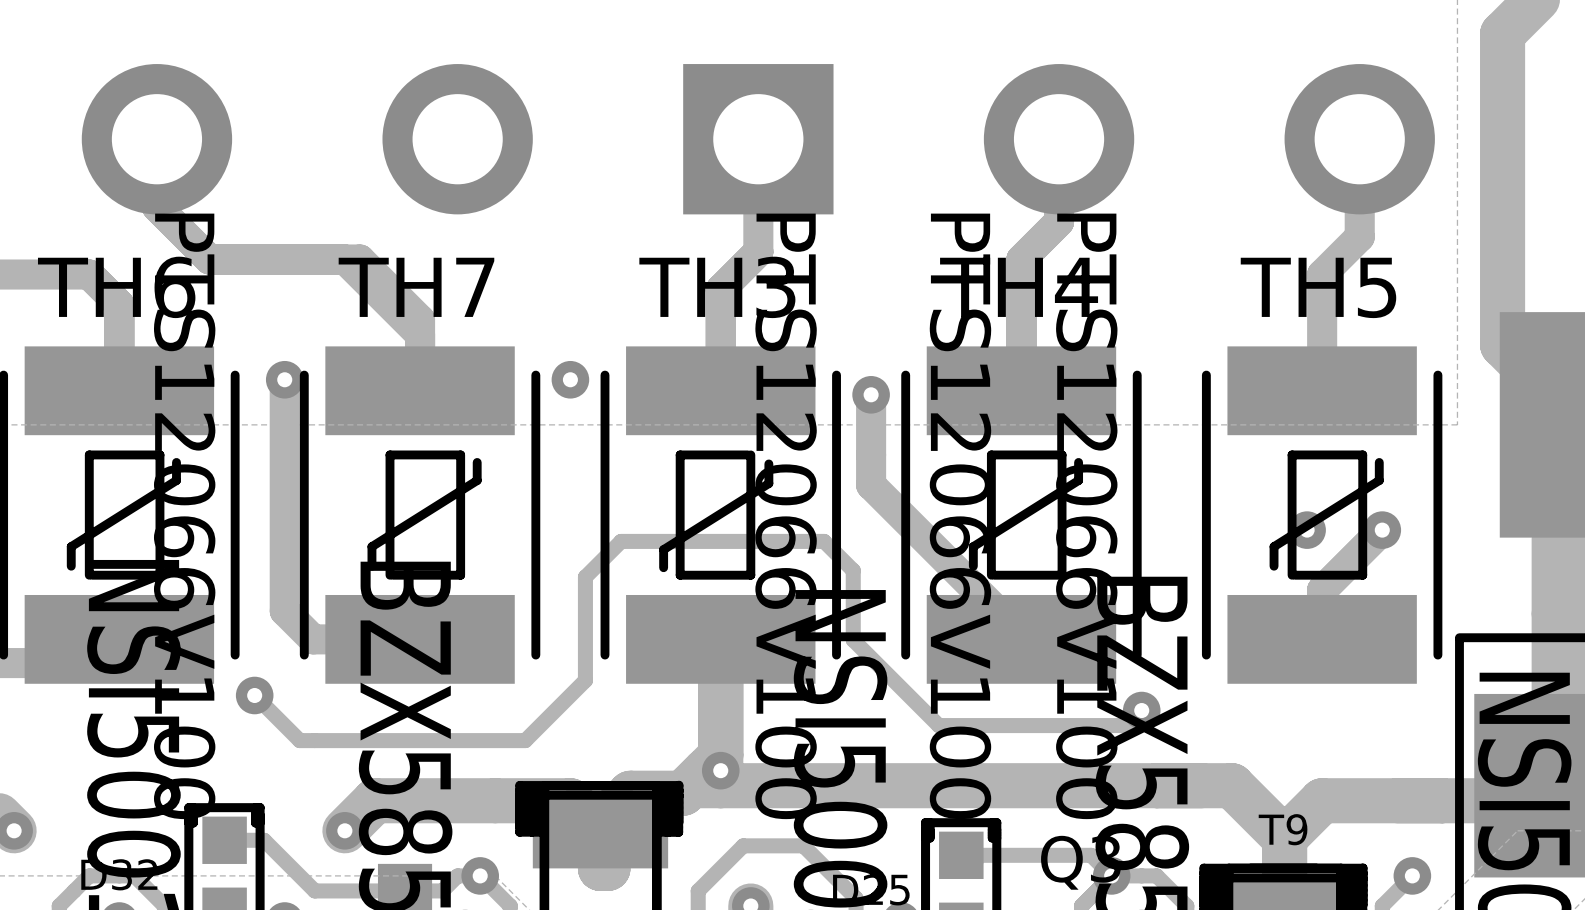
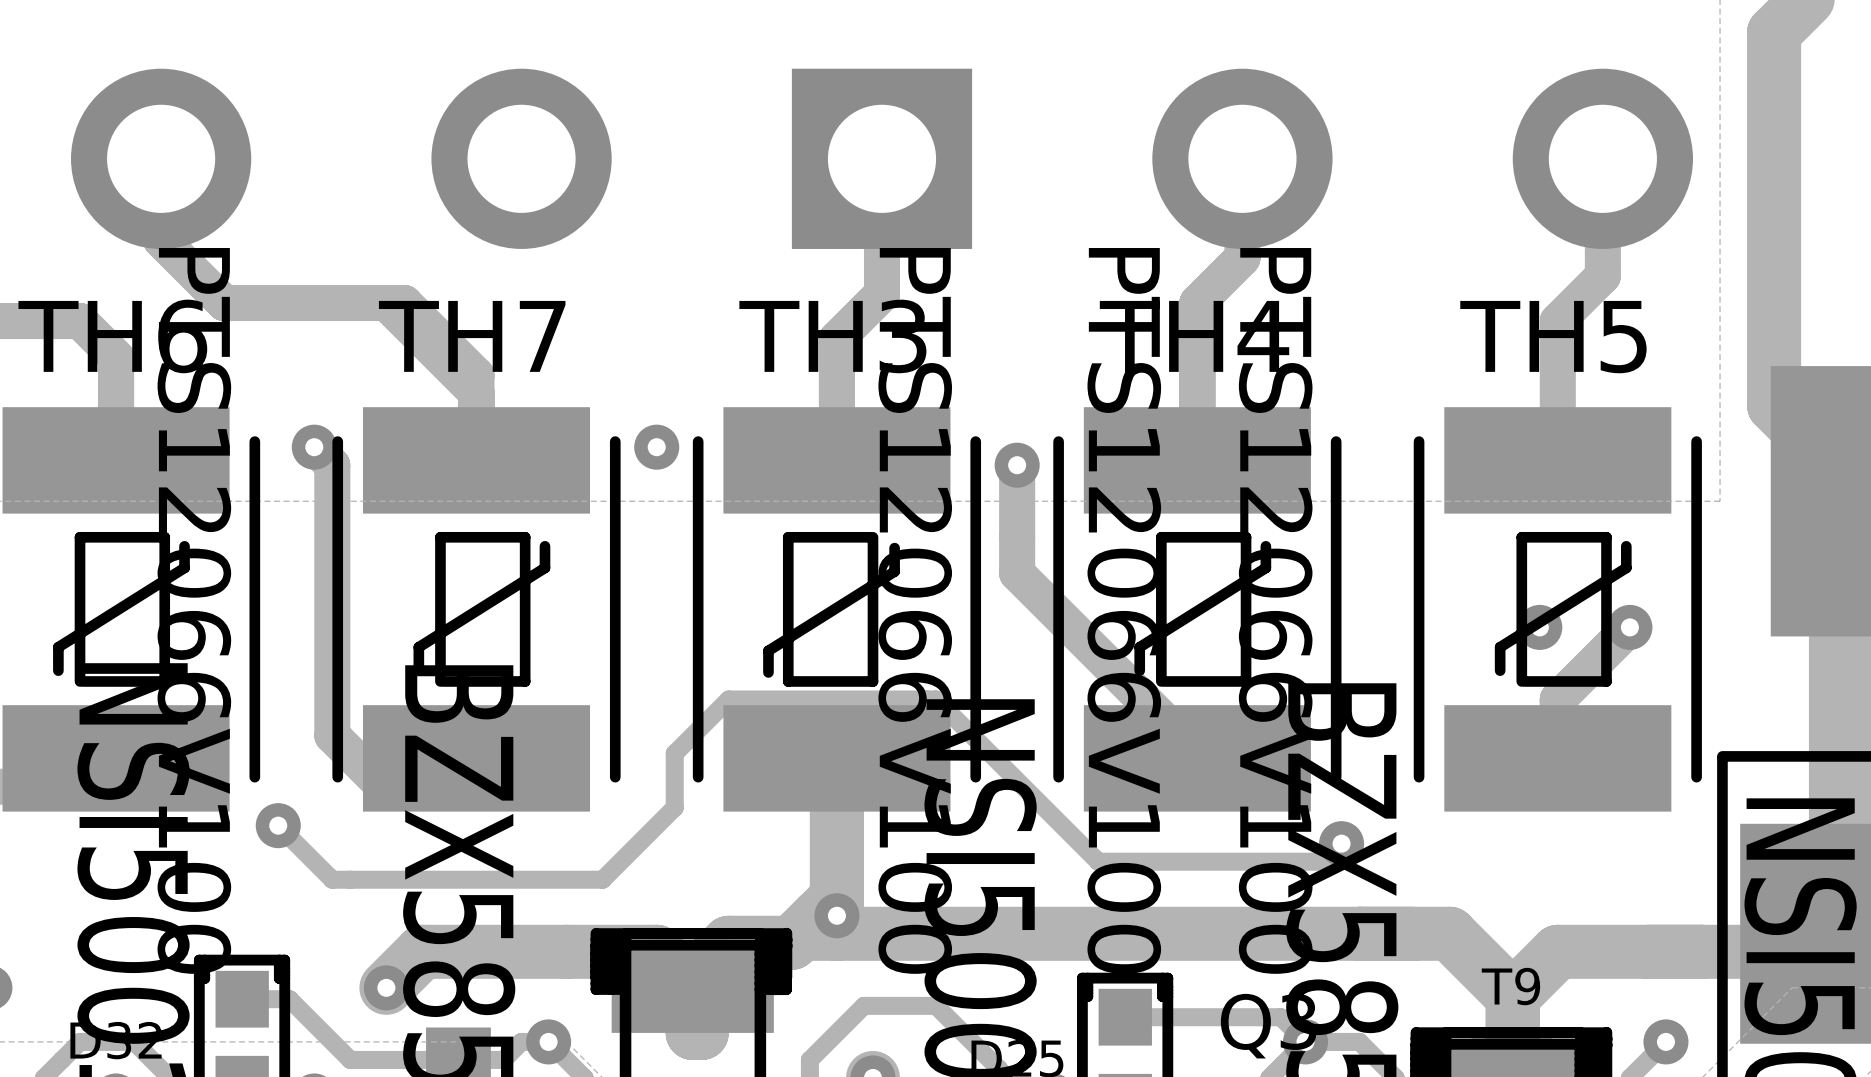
track: (284, 379) (284, 610) (313, 639) (420, 639) -> (314, 447) (332, 465) (332, 735) (383, 786)
track: (585, 635) (585, 577) (621, 541) (824, 541) (853, 570) (853, 640) -> (674, 753) (728, 699) (936, 699) (995, 759)

